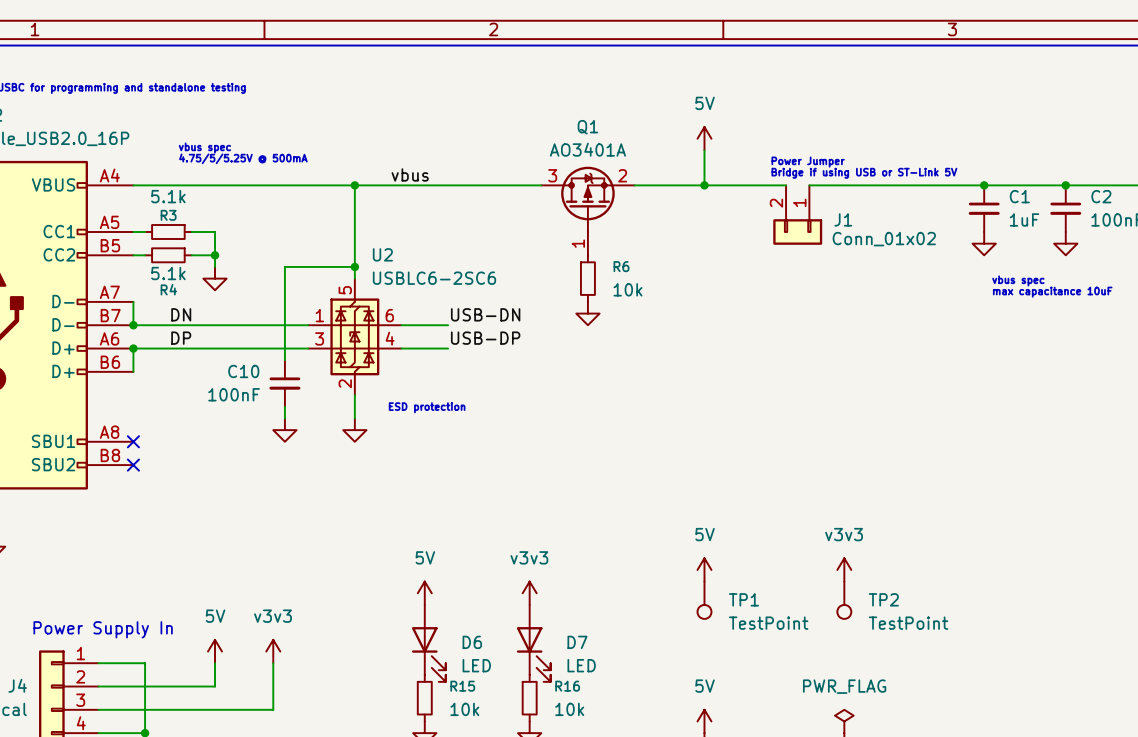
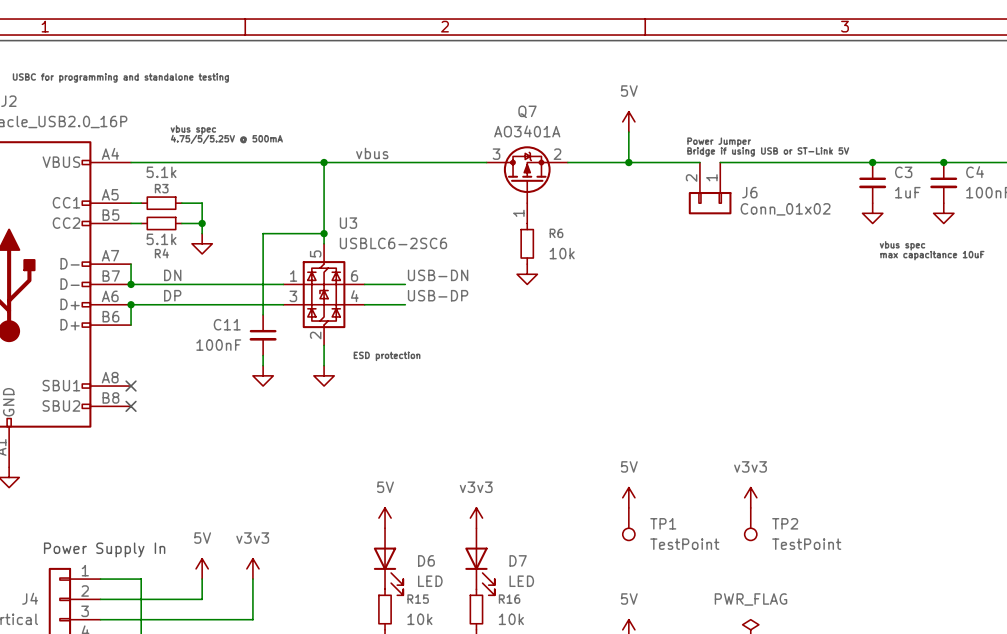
Q1 name: Q1 (587, 127) -> Q7 (527, 111)
C1 name: C1 (1019, 196) -> C3 (903, 172)
C2 name: C2 (1101, 196) -> C4 (975, 172)
J1 name: J1 (843, 219) -> J6 (749, 192)
U2 name: U2 (382, 254) -> U3 (348, 223)
C10 name: C10 (243, 371) -> C11 (227, 324)

